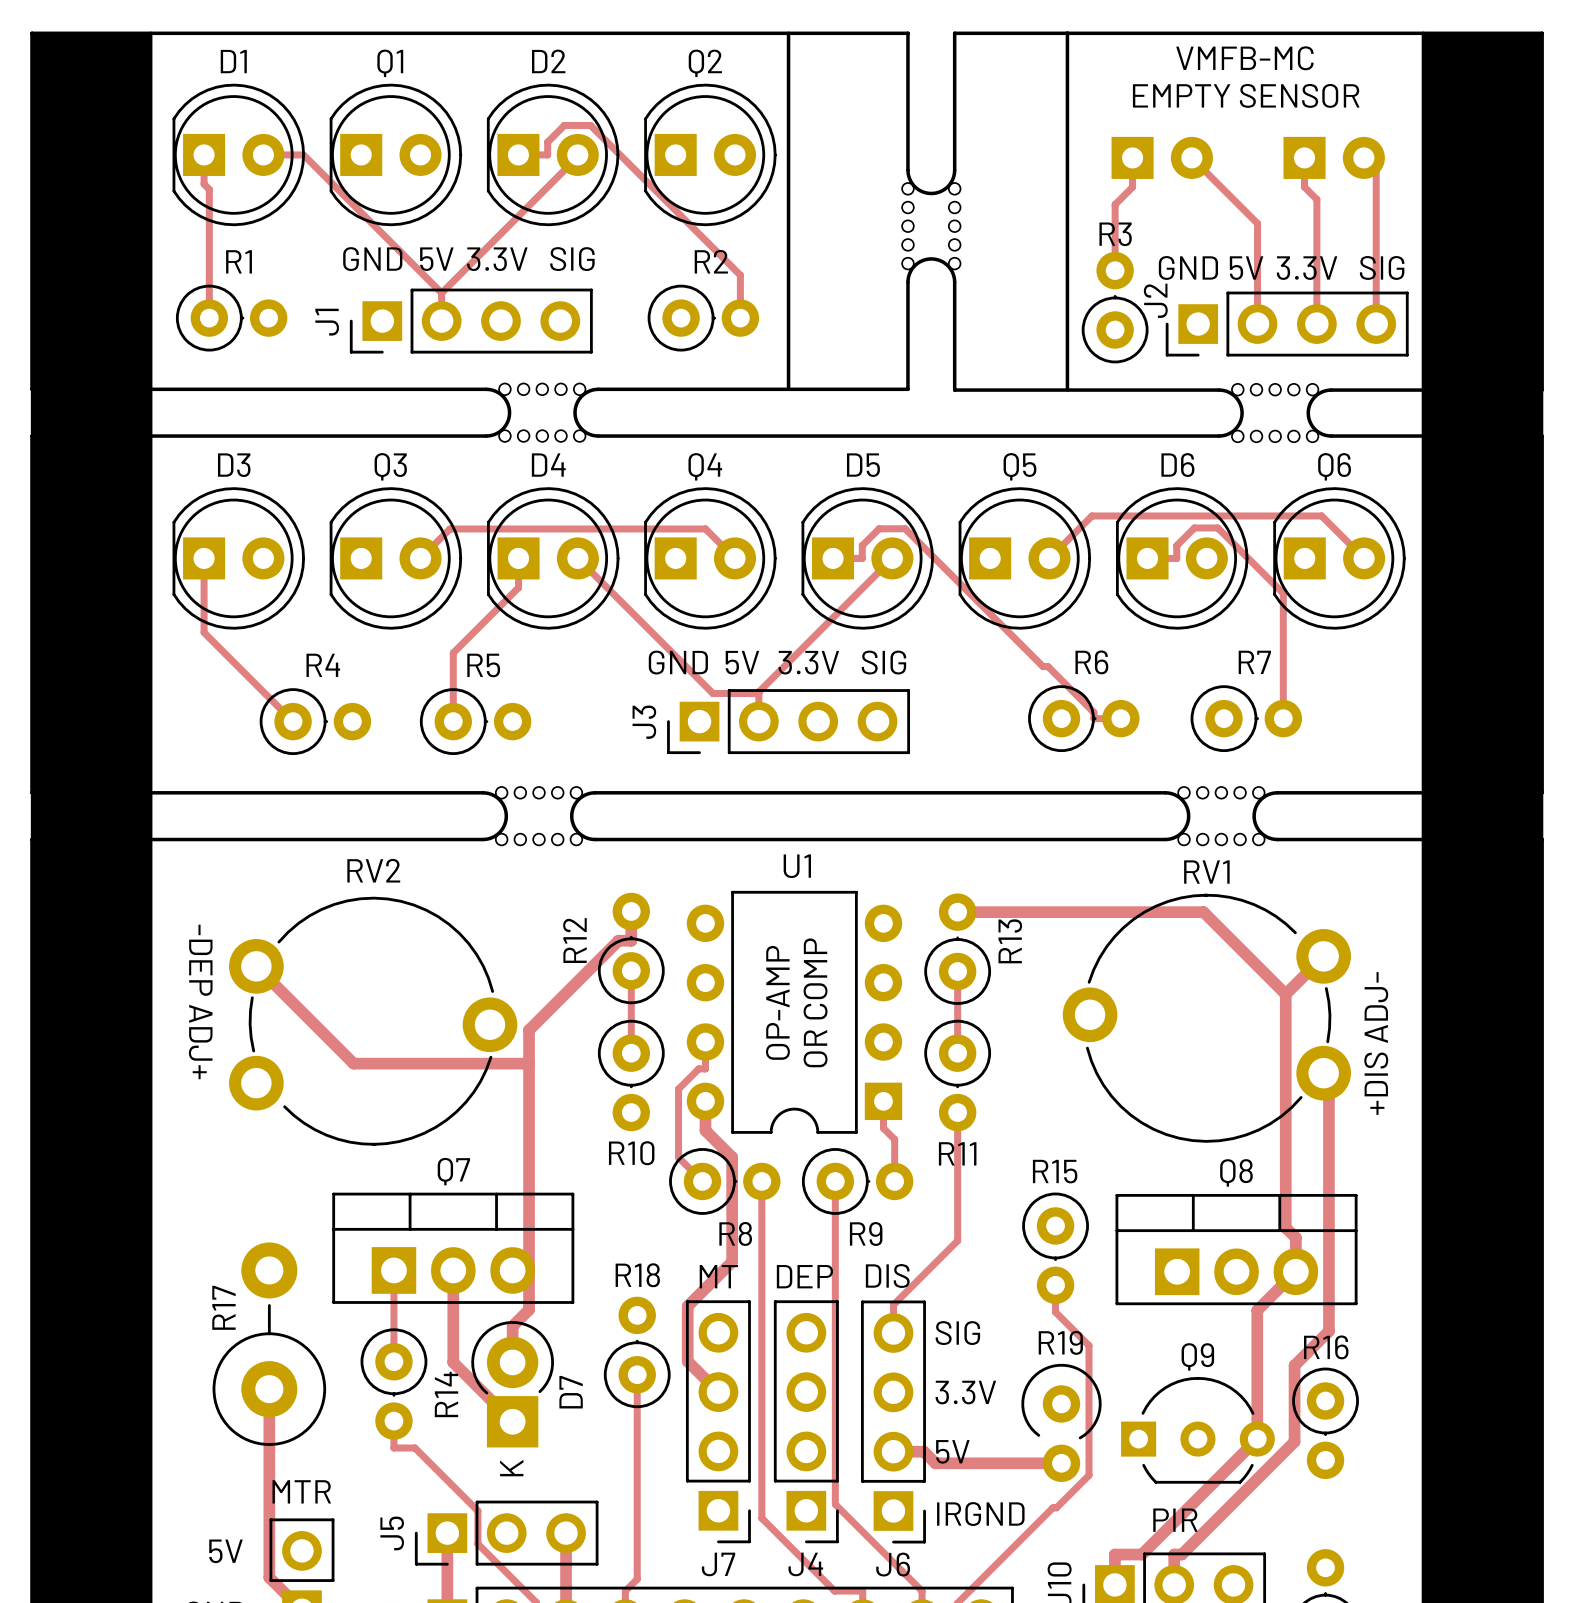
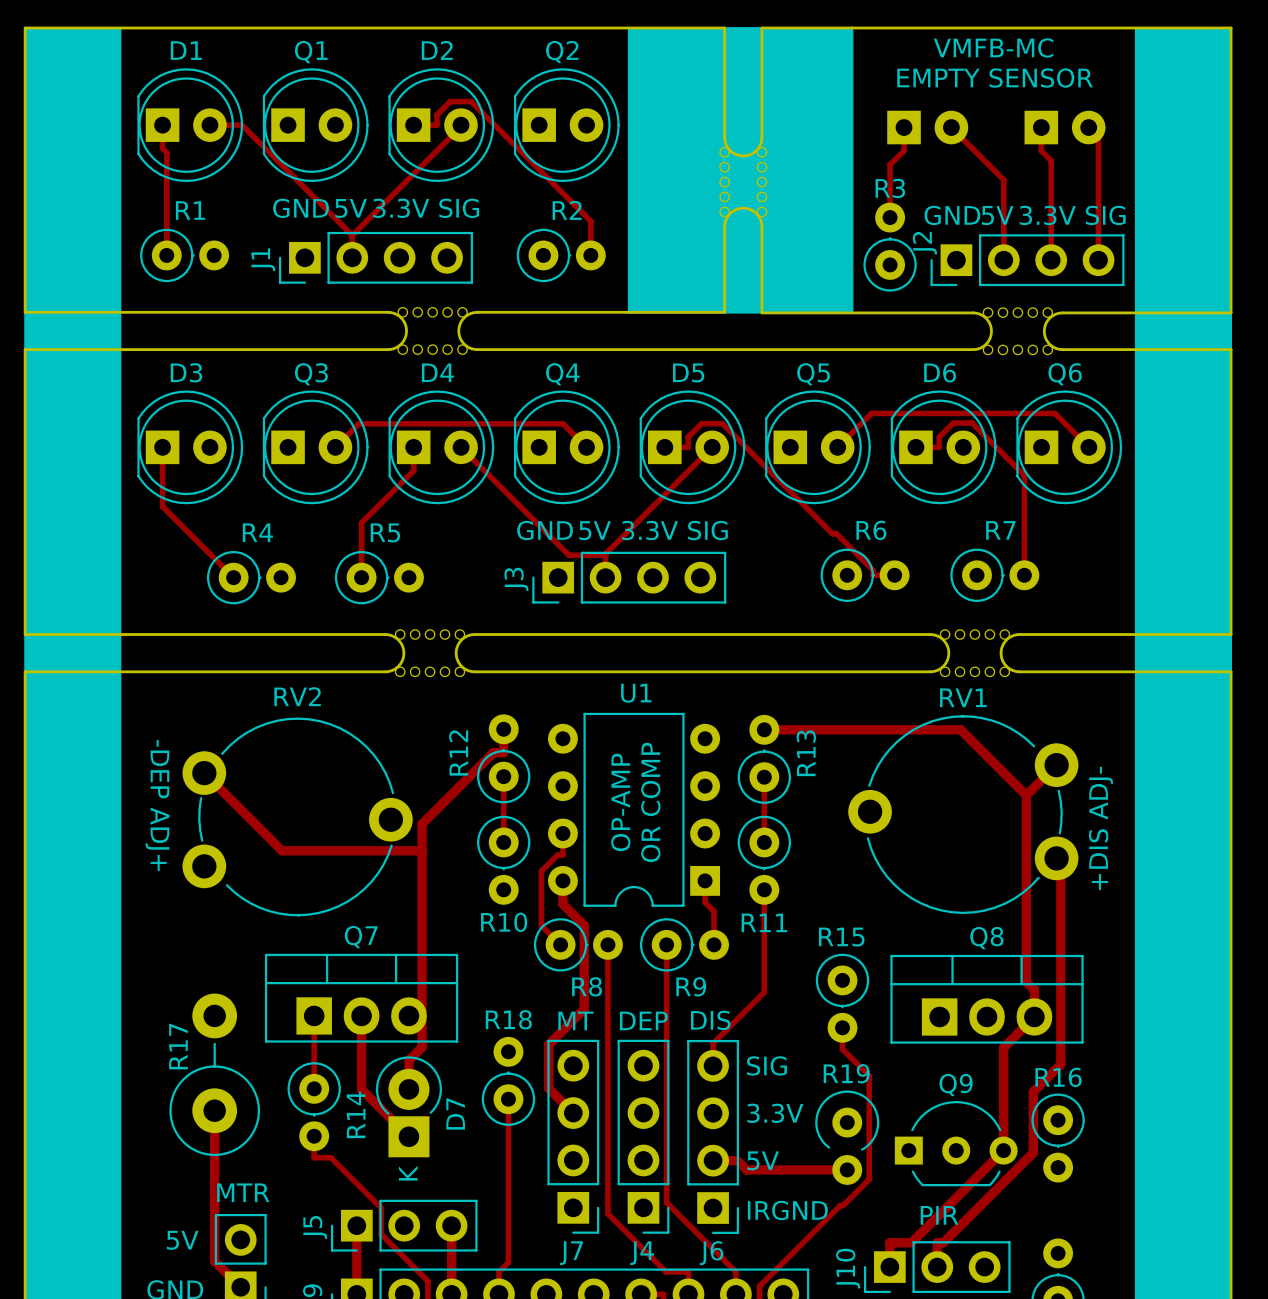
drawing: none -> [628, 27, 853, 314]

